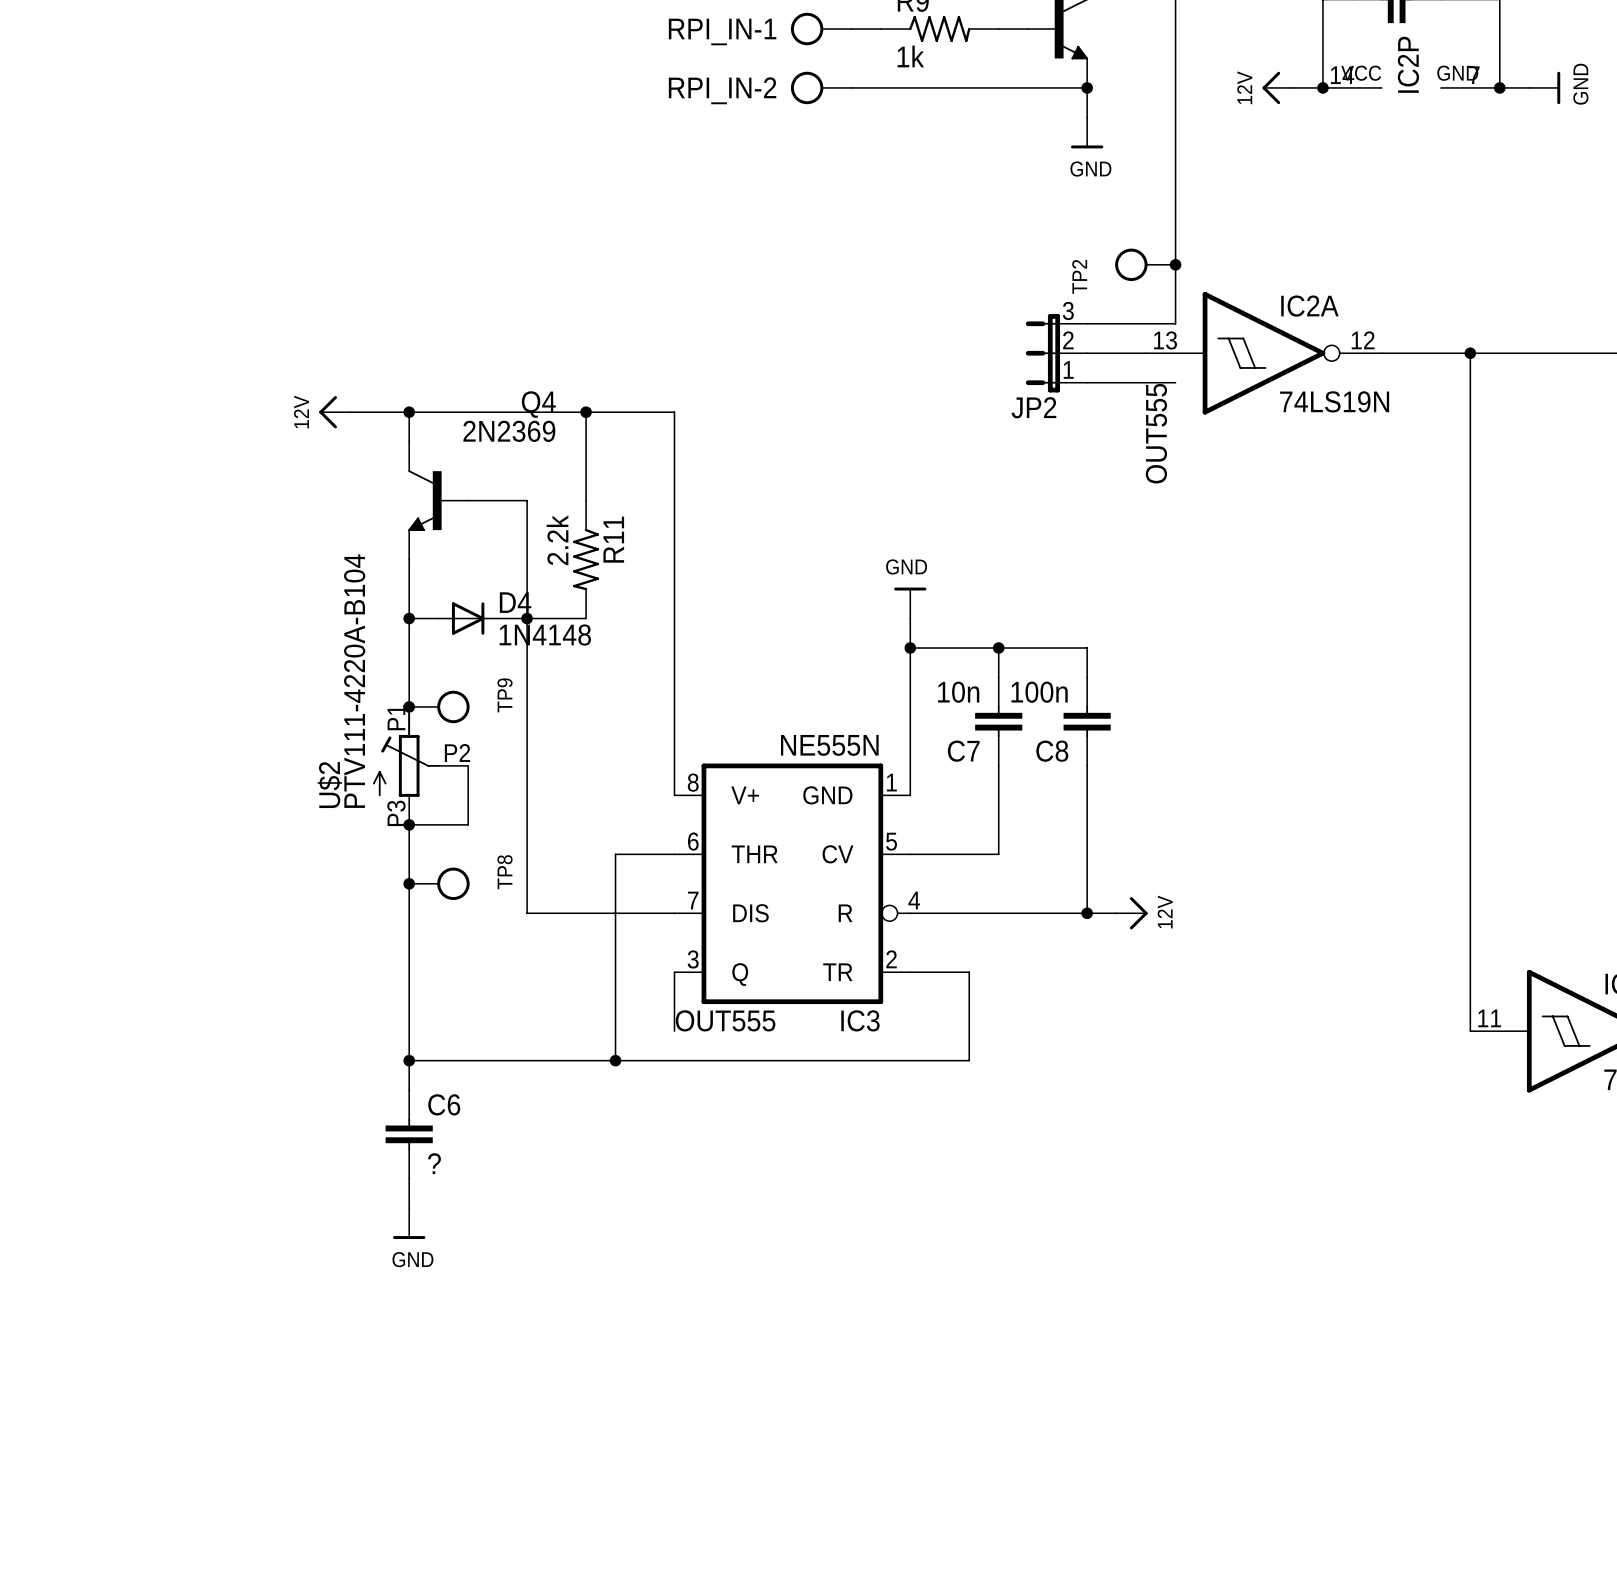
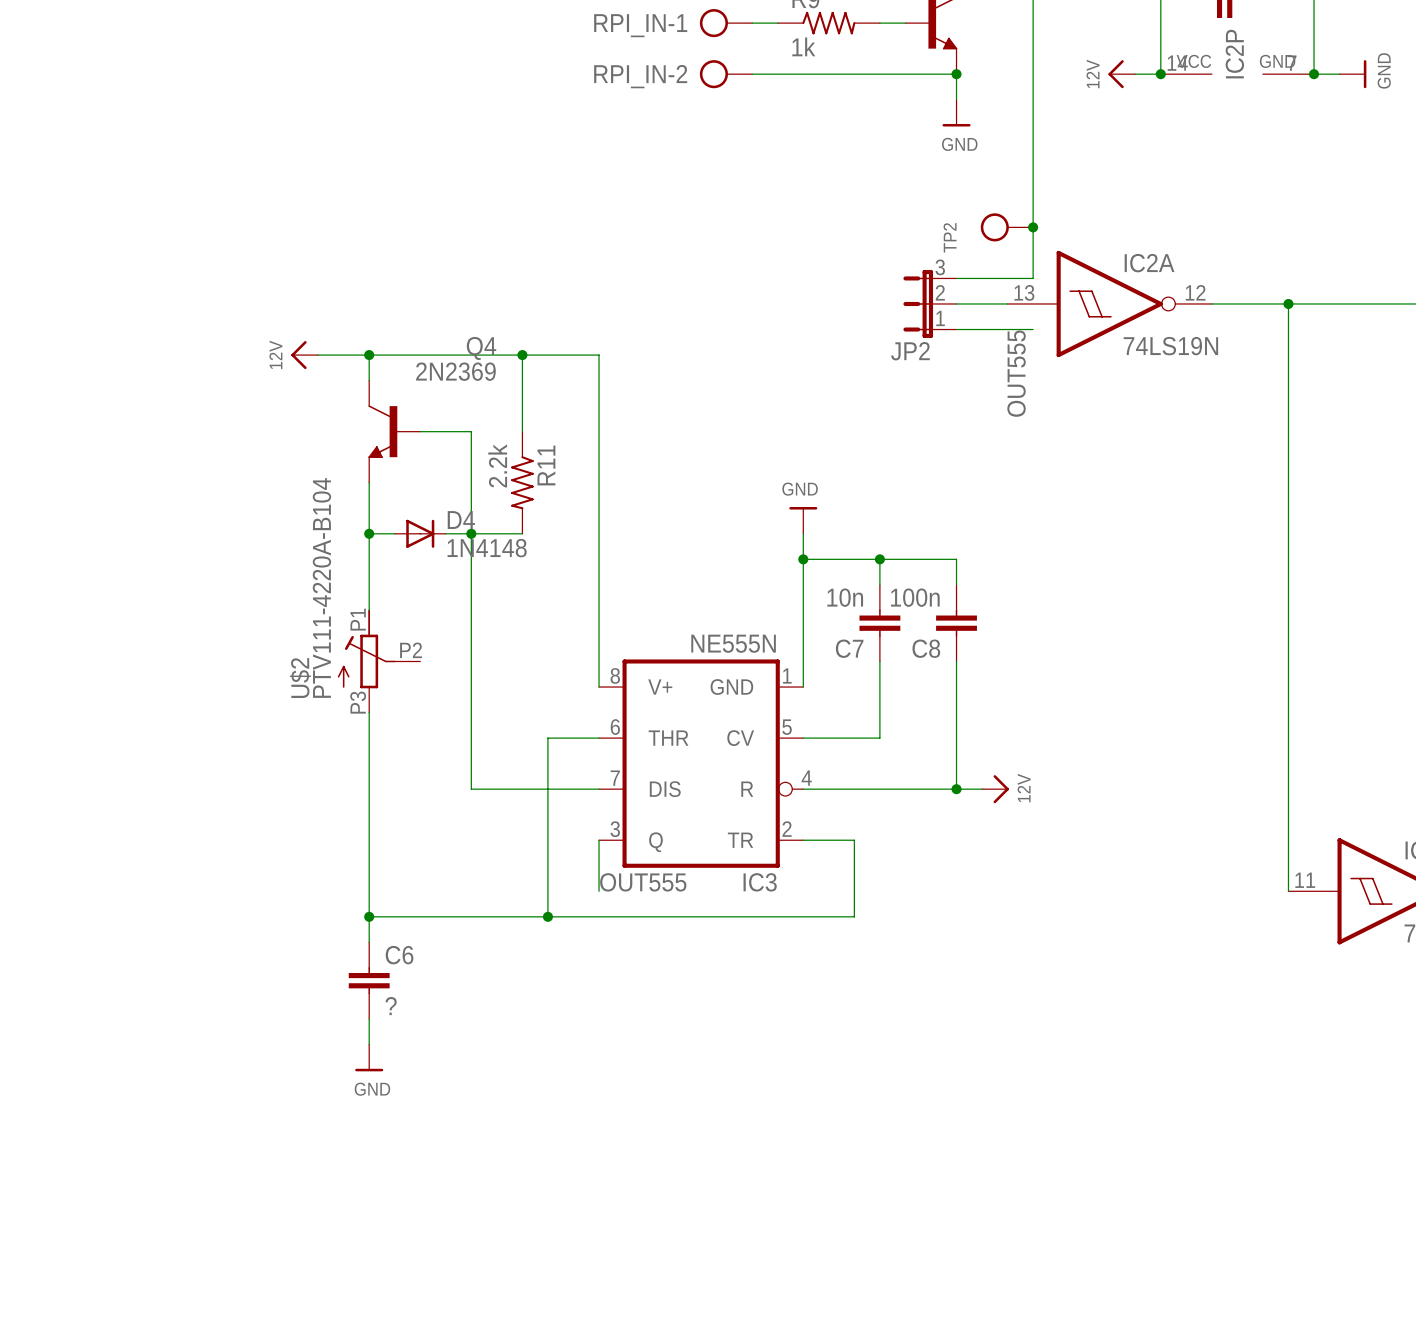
junction: (409, 706) -> none
TP9: (439, 706) -> none
wire: (468, 765) (468, 824) (409, 824) -> none
junction: (409, 824) -> none
junction: (409, 883) -> none
TP8: (439, 883) -> none

